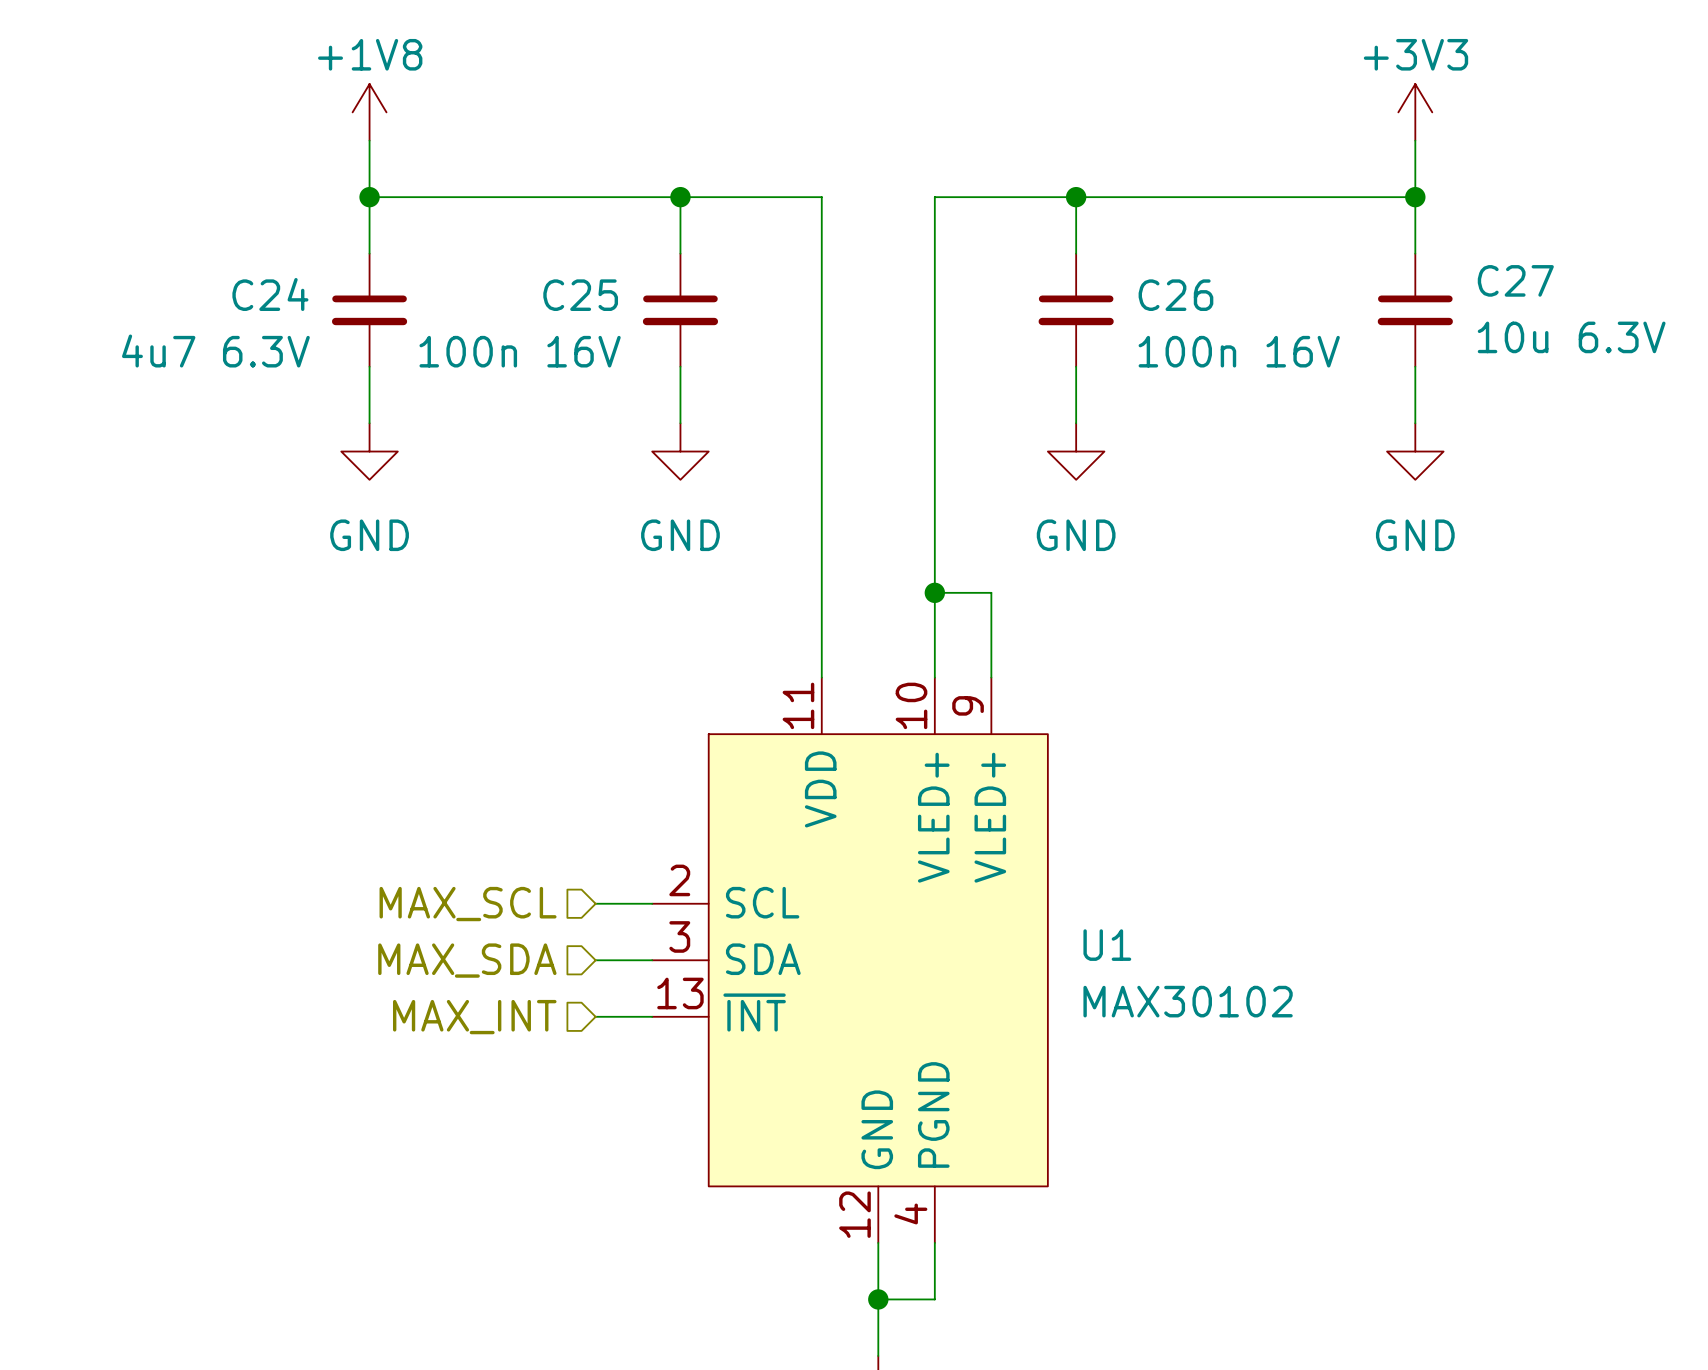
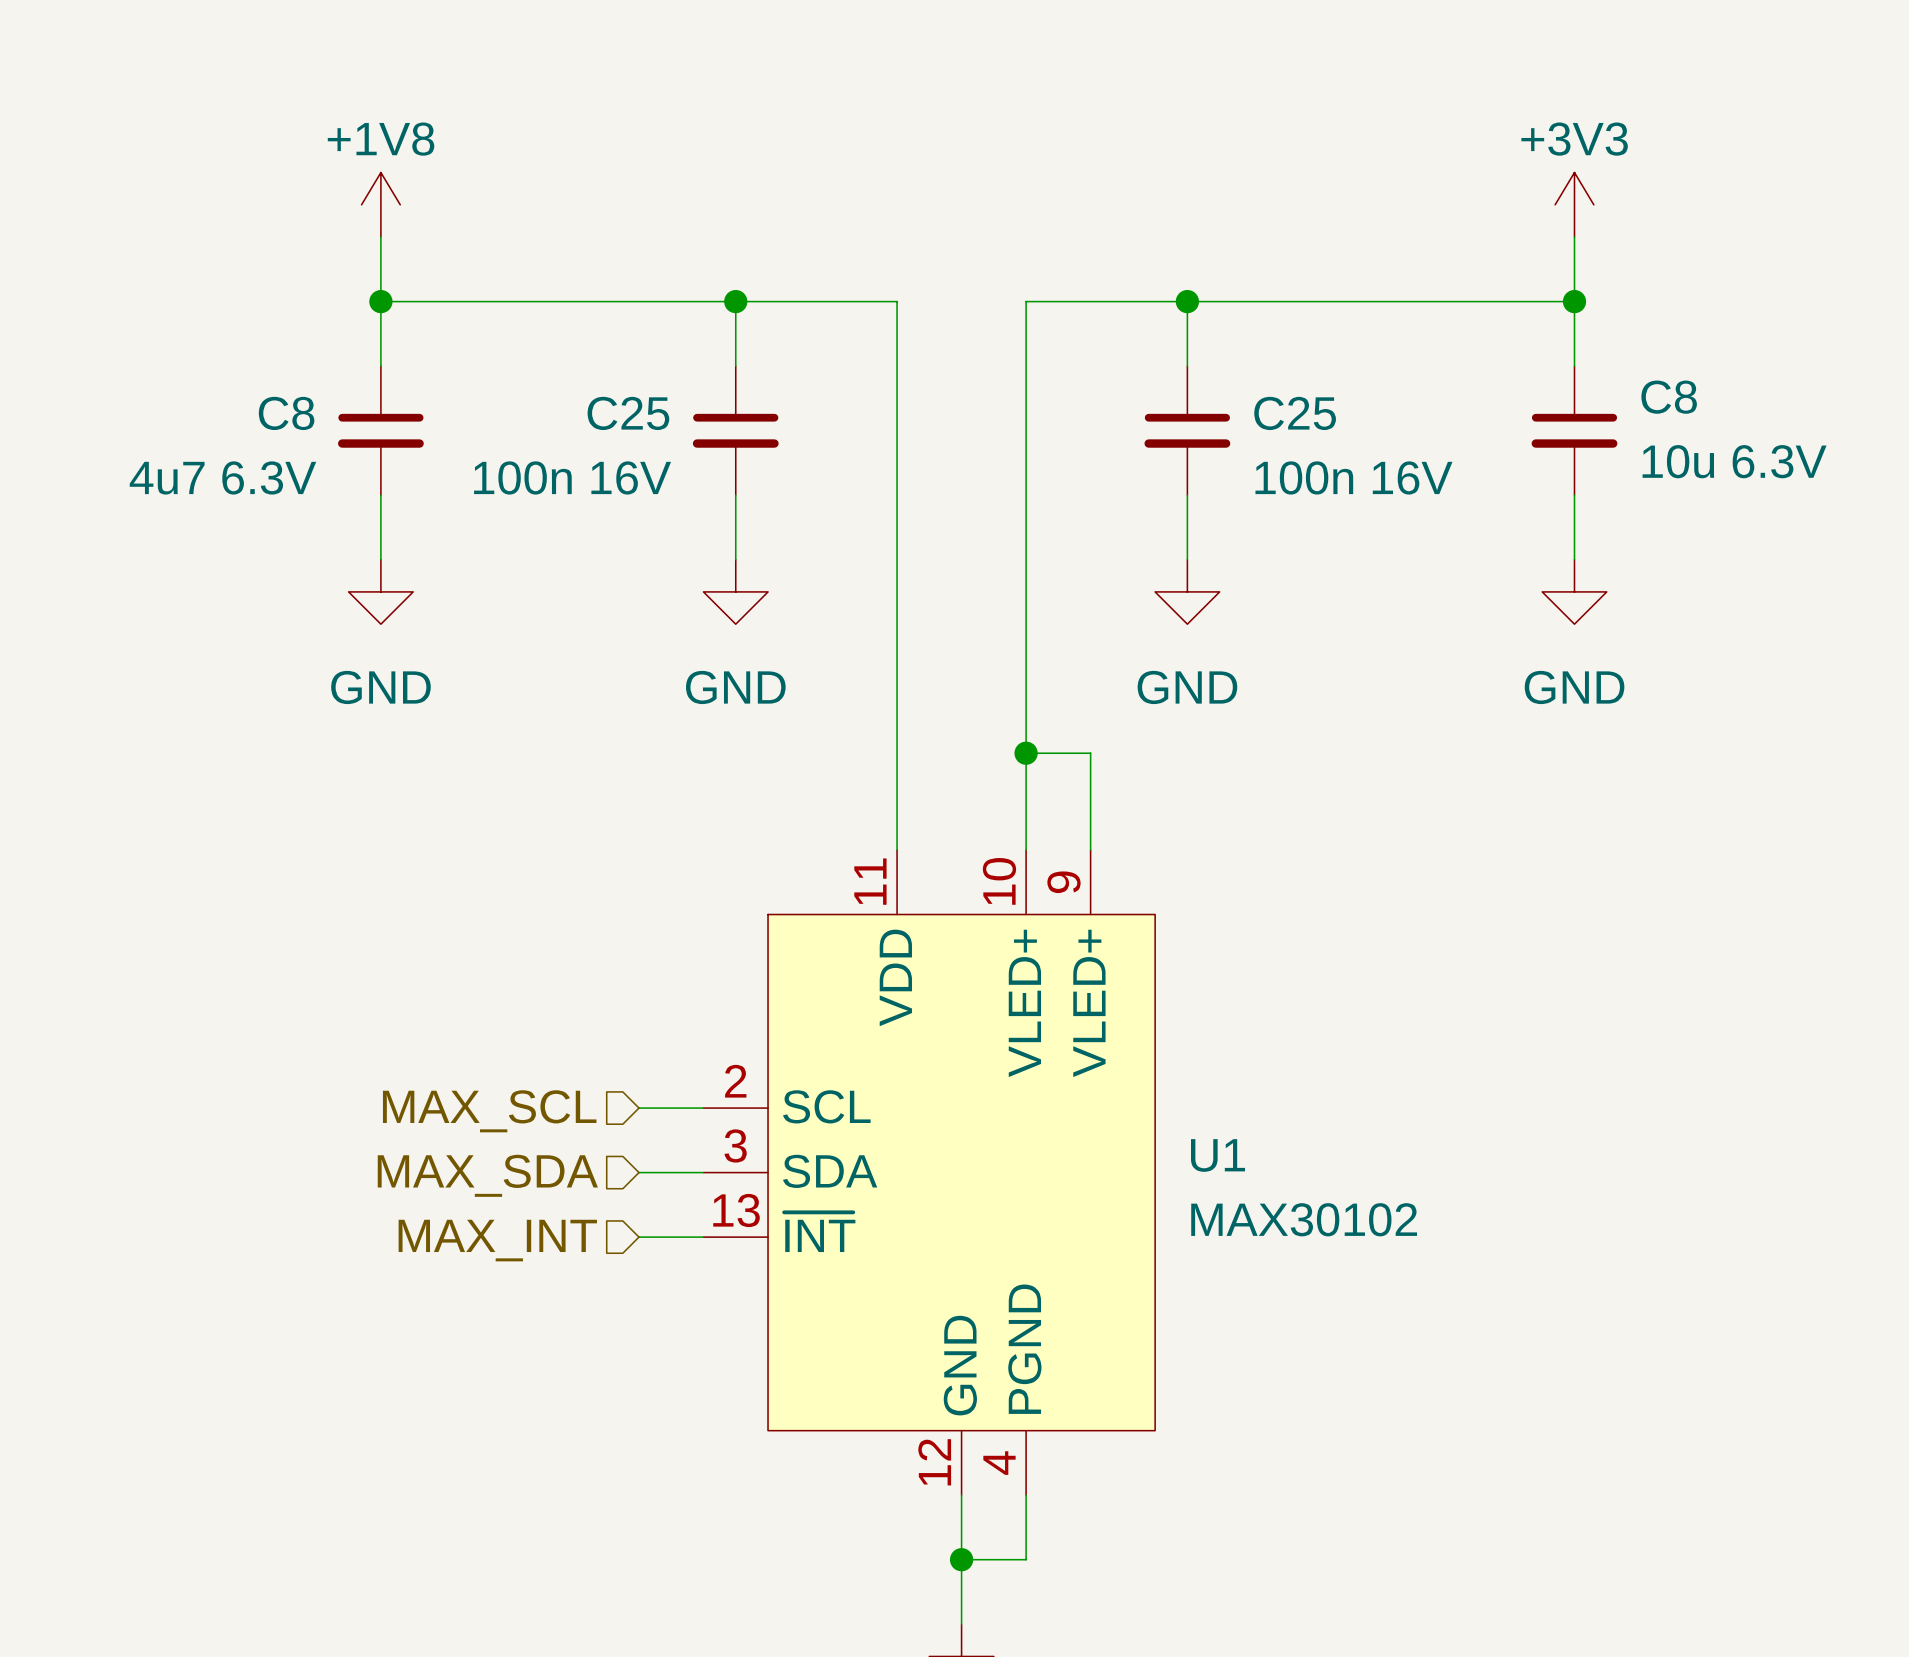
C27 name: C27 (1515, 280) -> C8 (1669, 397)
C24 name: C24 (270, 294) -> C8 (286, 413)
C26 name: C26 (1175, 295) -> C25 (1295, 413)

